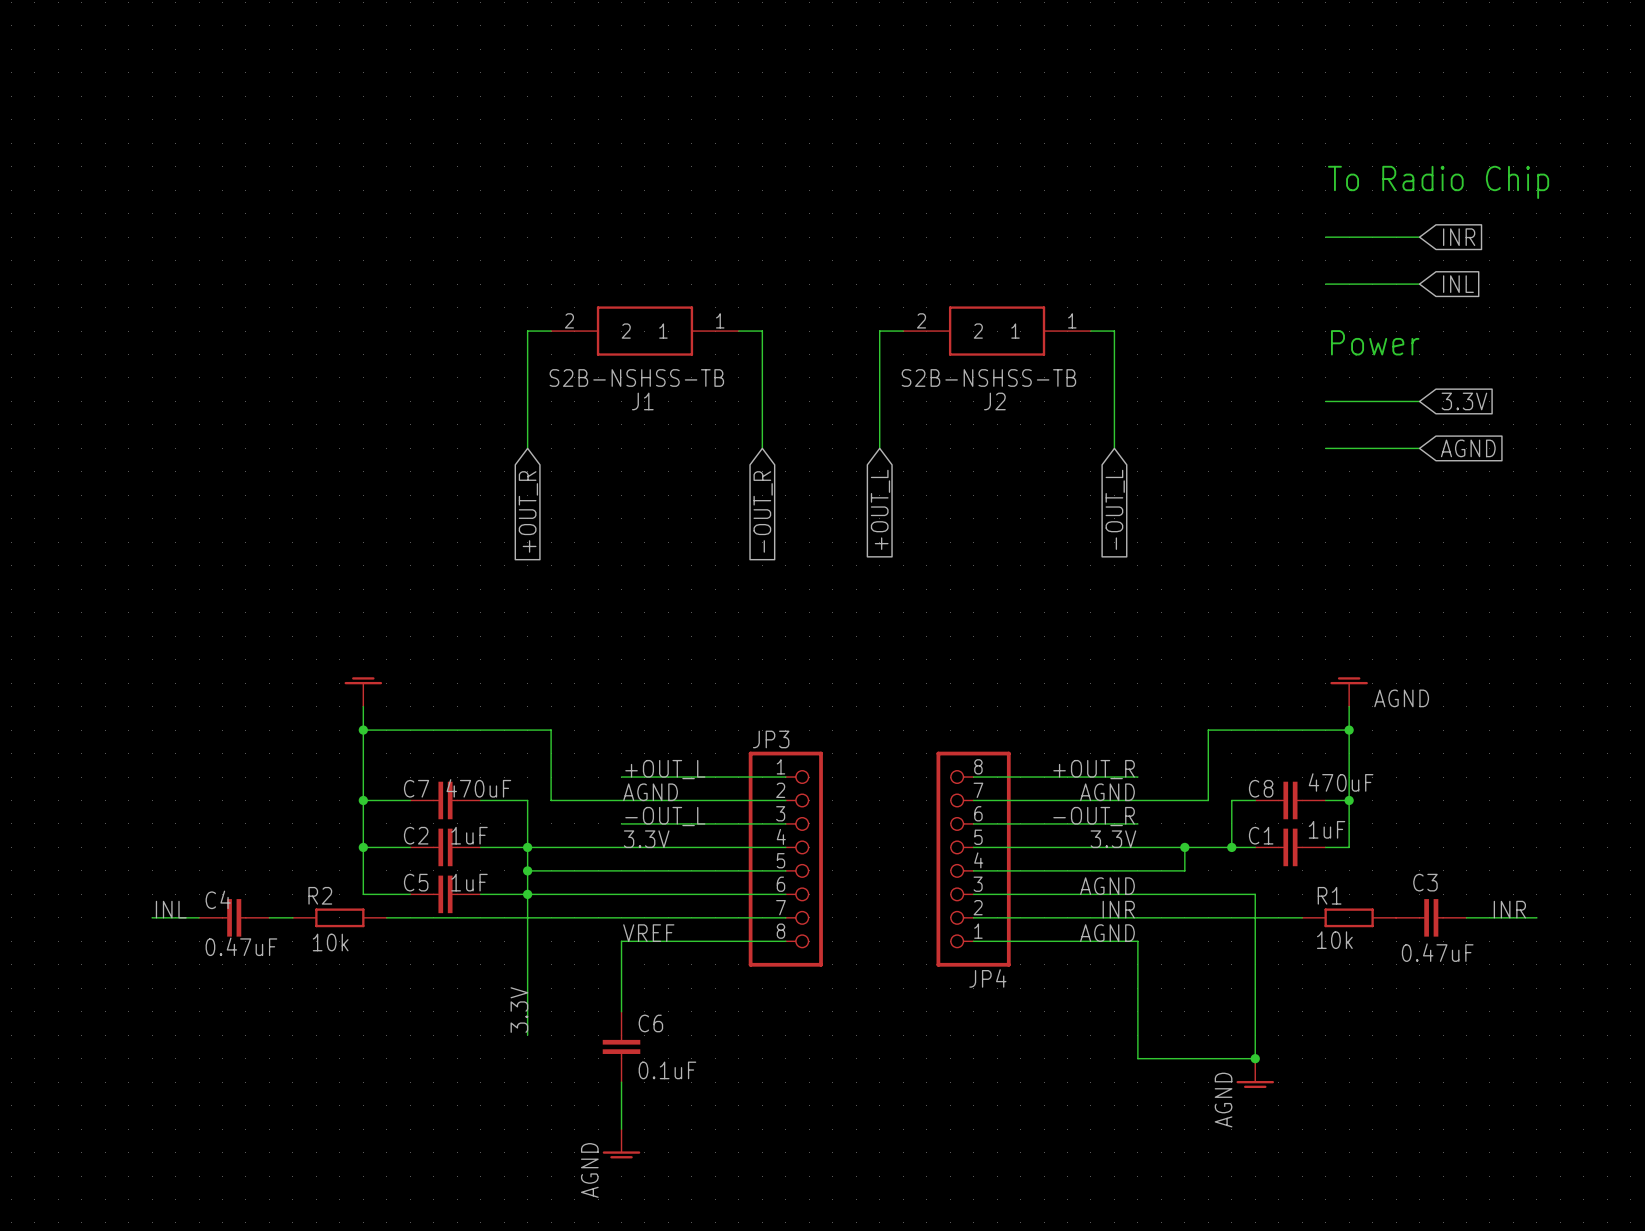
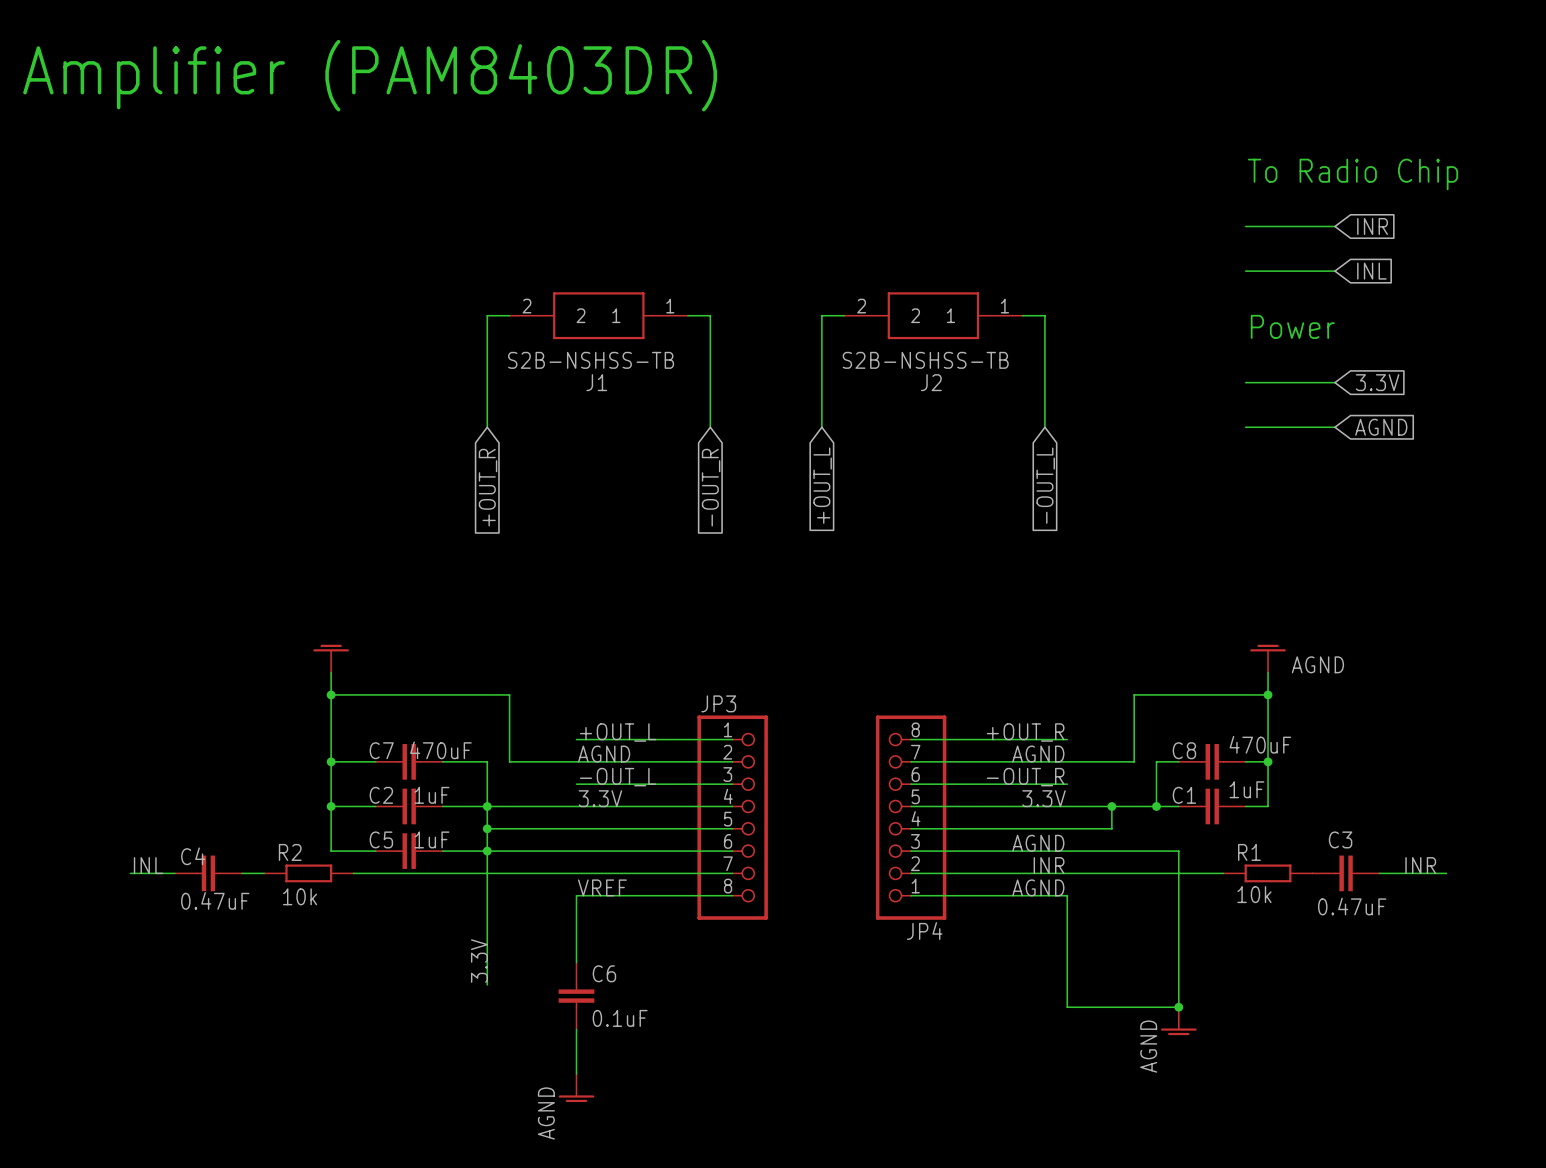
text: none -> Amplifier (PAM8403DR) (370, 75)

